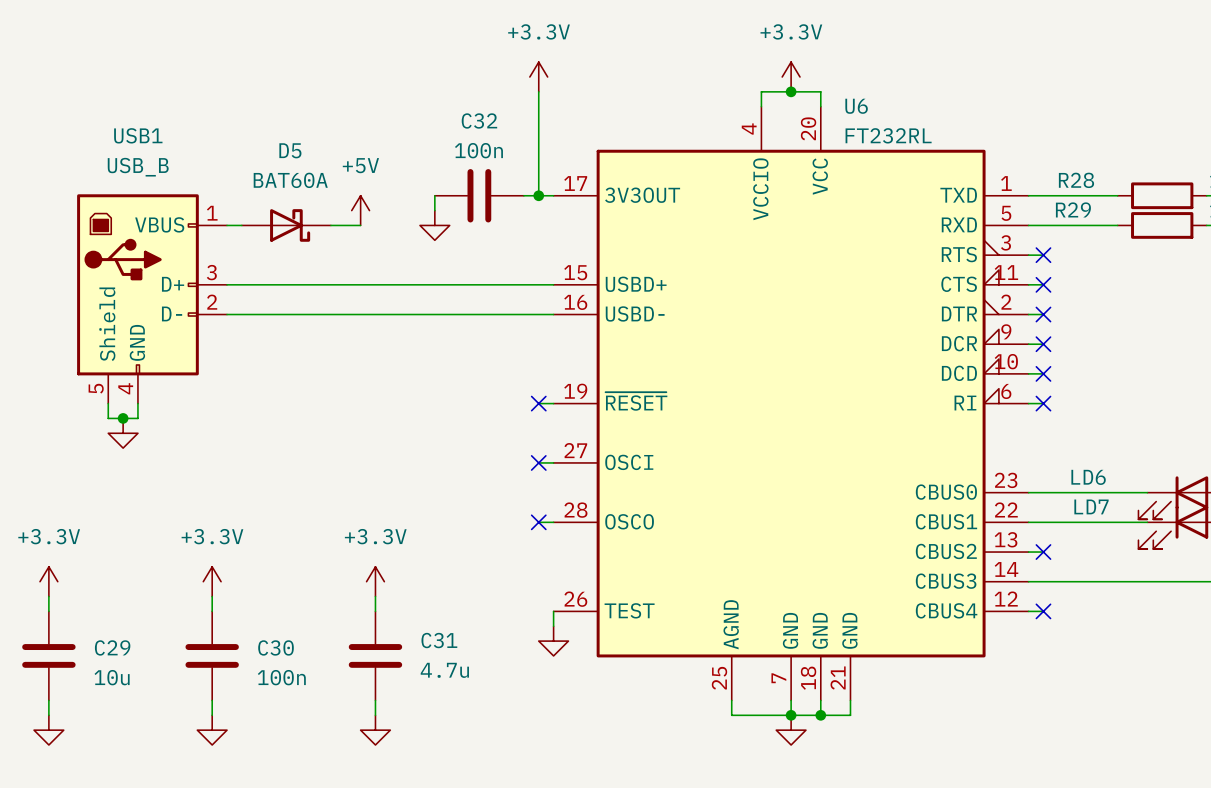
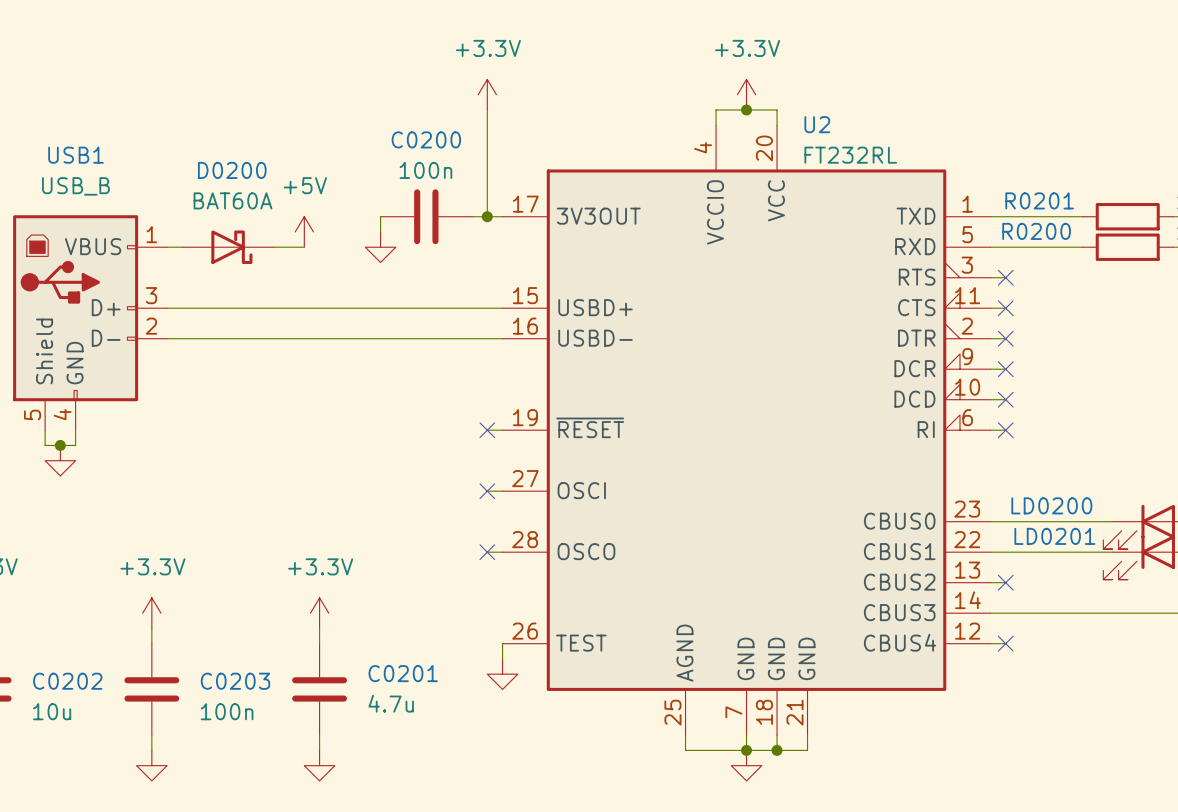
U6 name: U6 (856, 106) -> U2 (817, 124)
C32 name: C32 (479, 120) -> C0200 (426, 139)
D5 name: D5 (290, 150) -> D0200 (232, 170)
R28 name: R28 (1076, 180) -> R0201 (1039, 200)
R29 name: R29 (1073, 209) -> R0200 (1036, 231)
LD6 name: LD6 (1088, 477) -> LD0200 (1051, 505)
LD7 name: LD7 (1091, 506) -> LD0201 (1054, 536)
C31 name: C31 (439, 640) -> C0201 (403, 673)
C29 name: C29 (112, 647) -> C0202 (67, 681)
C30 name: C30 (276, 647) -> C0203 (235, 681)

